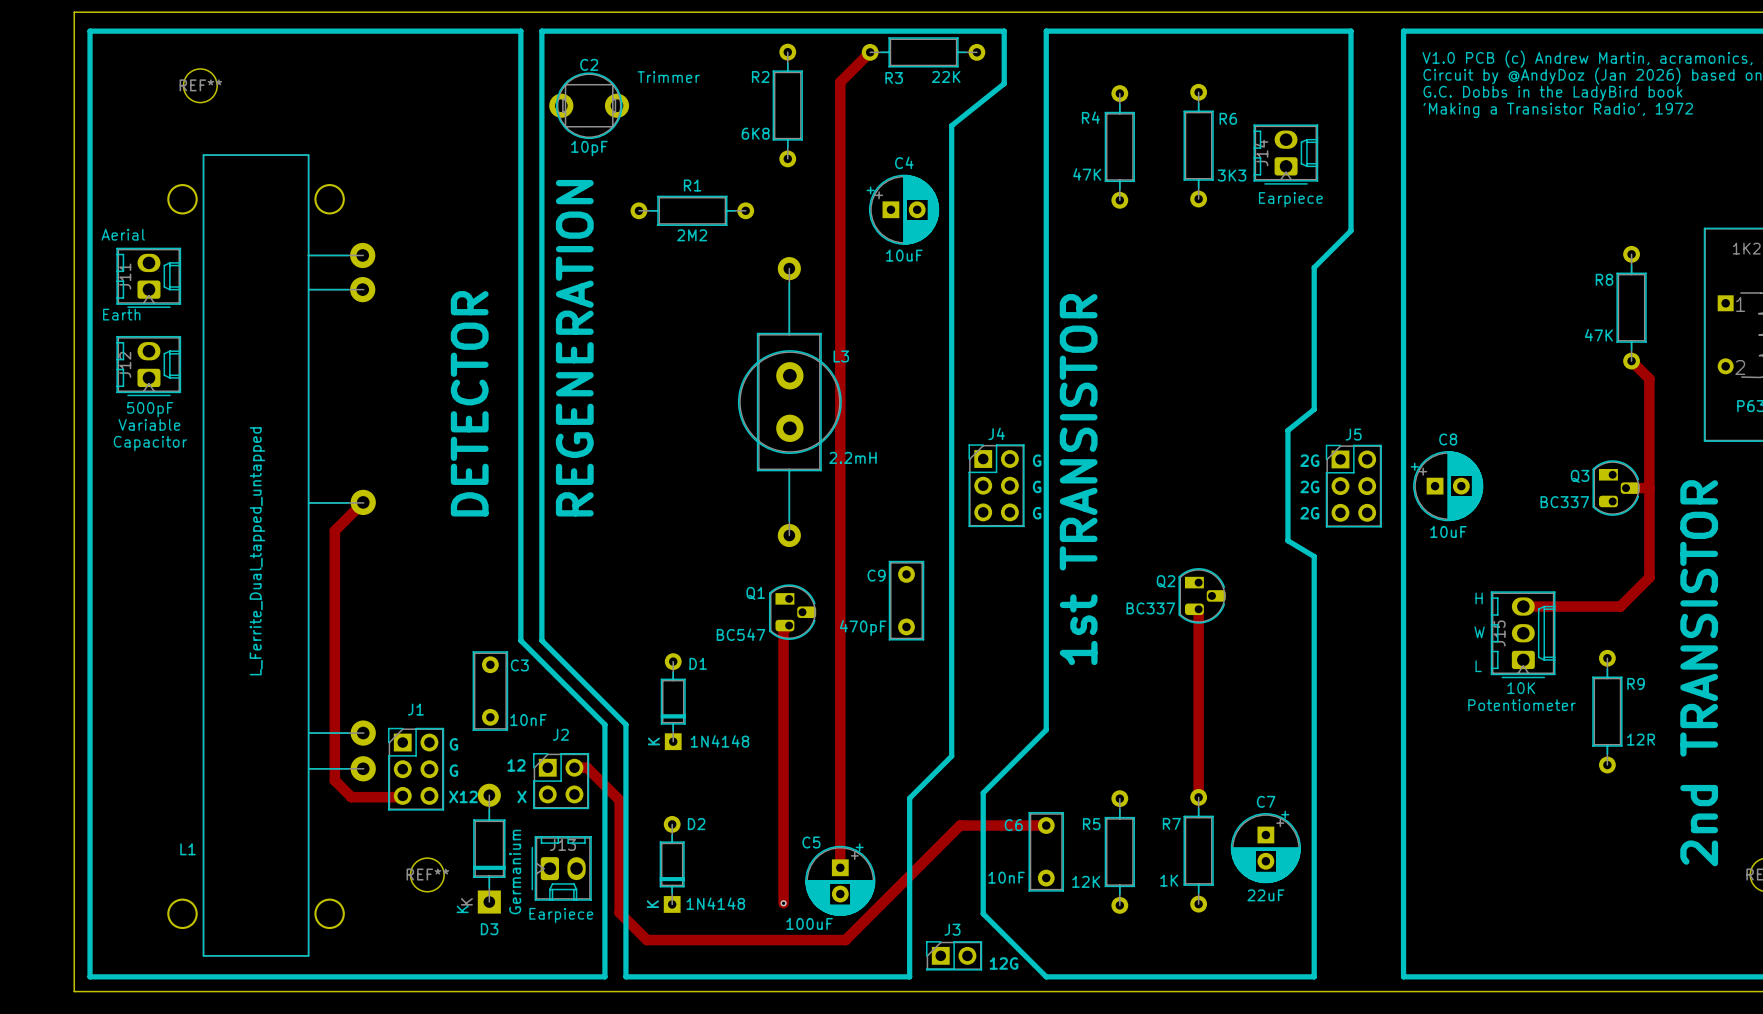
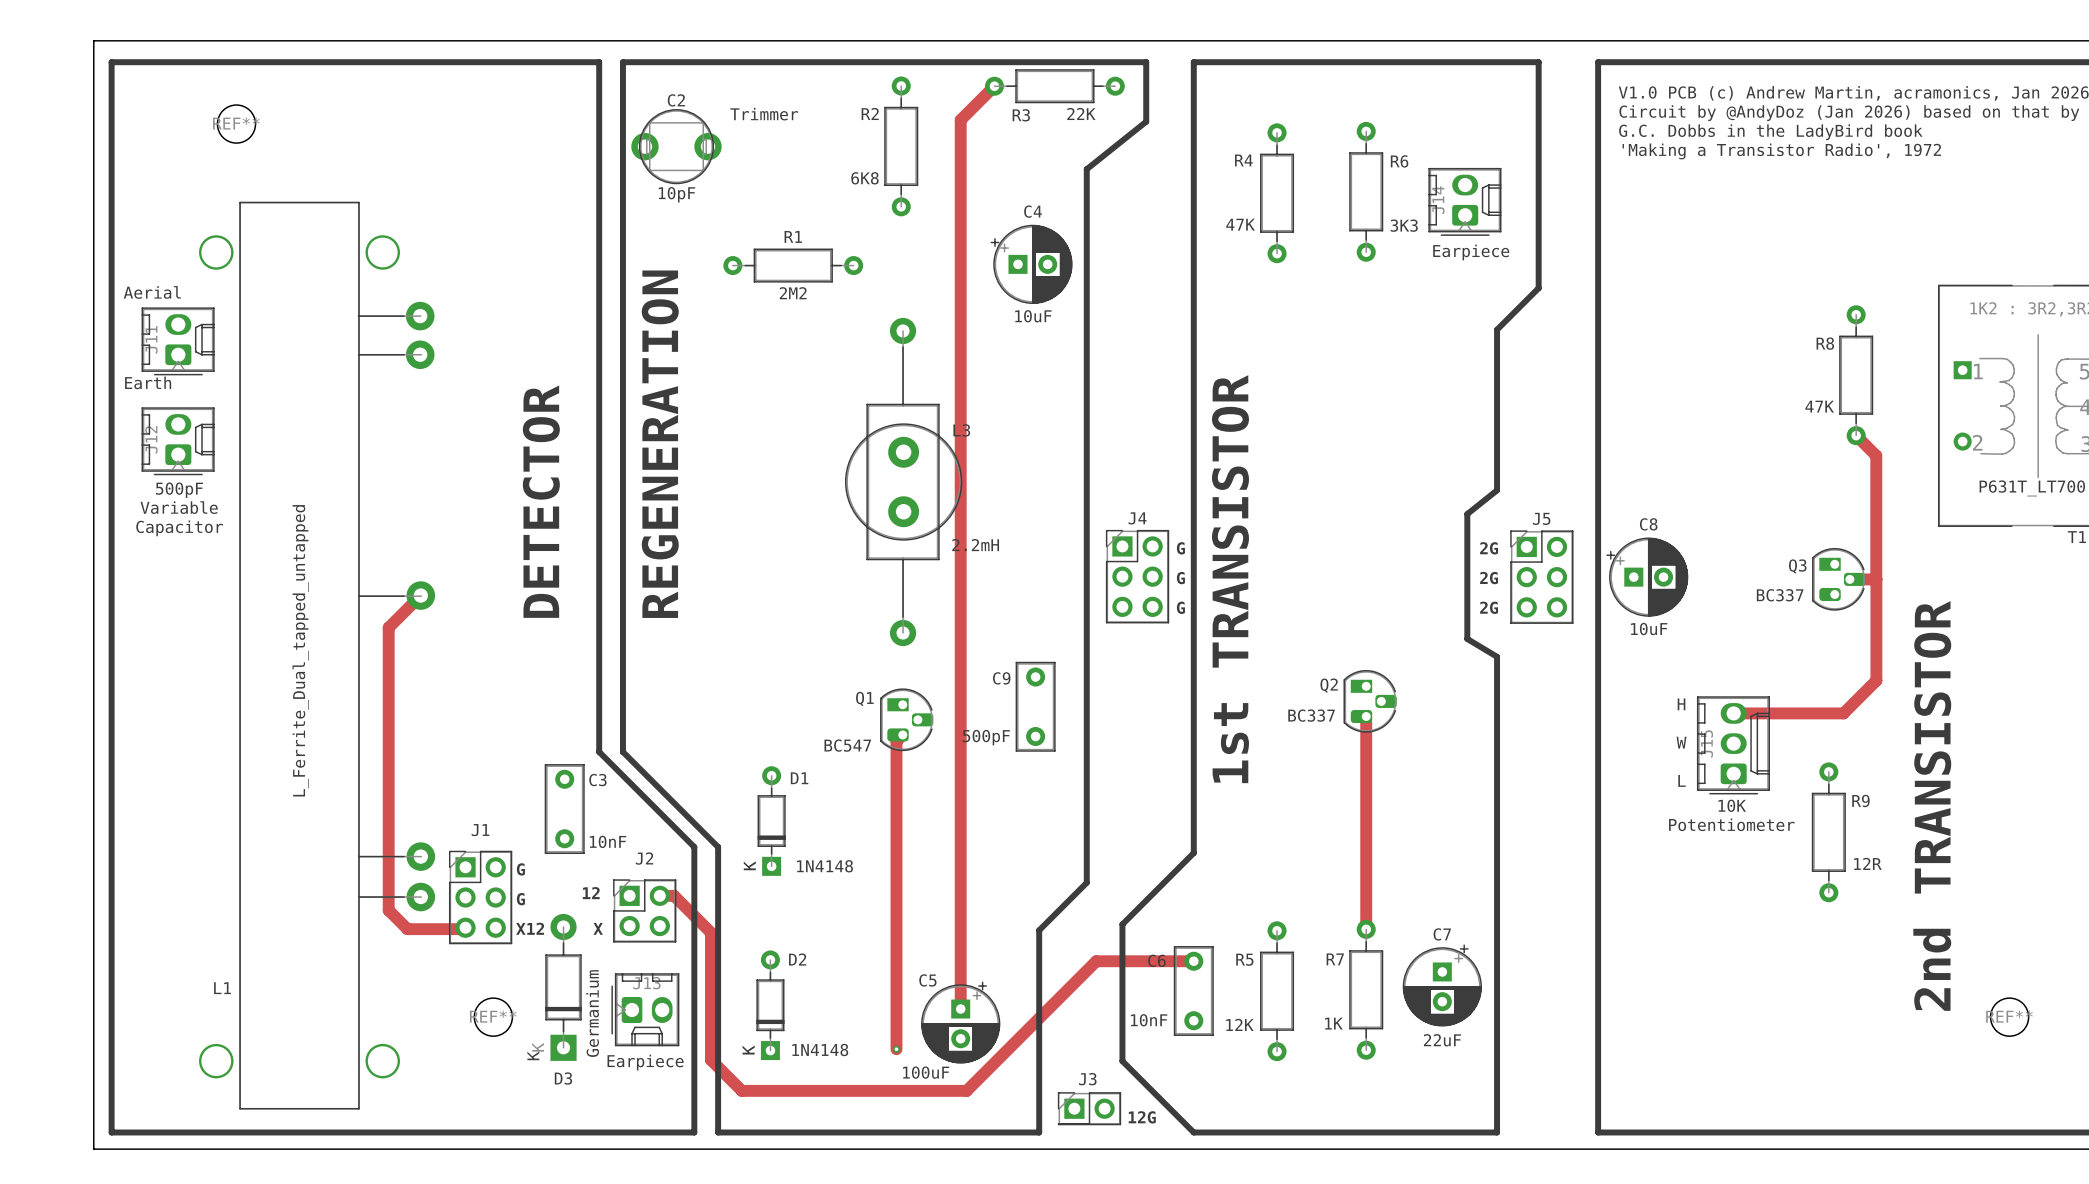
C9 value: 470pF (863, 628) -> 500pF (986, 737)

